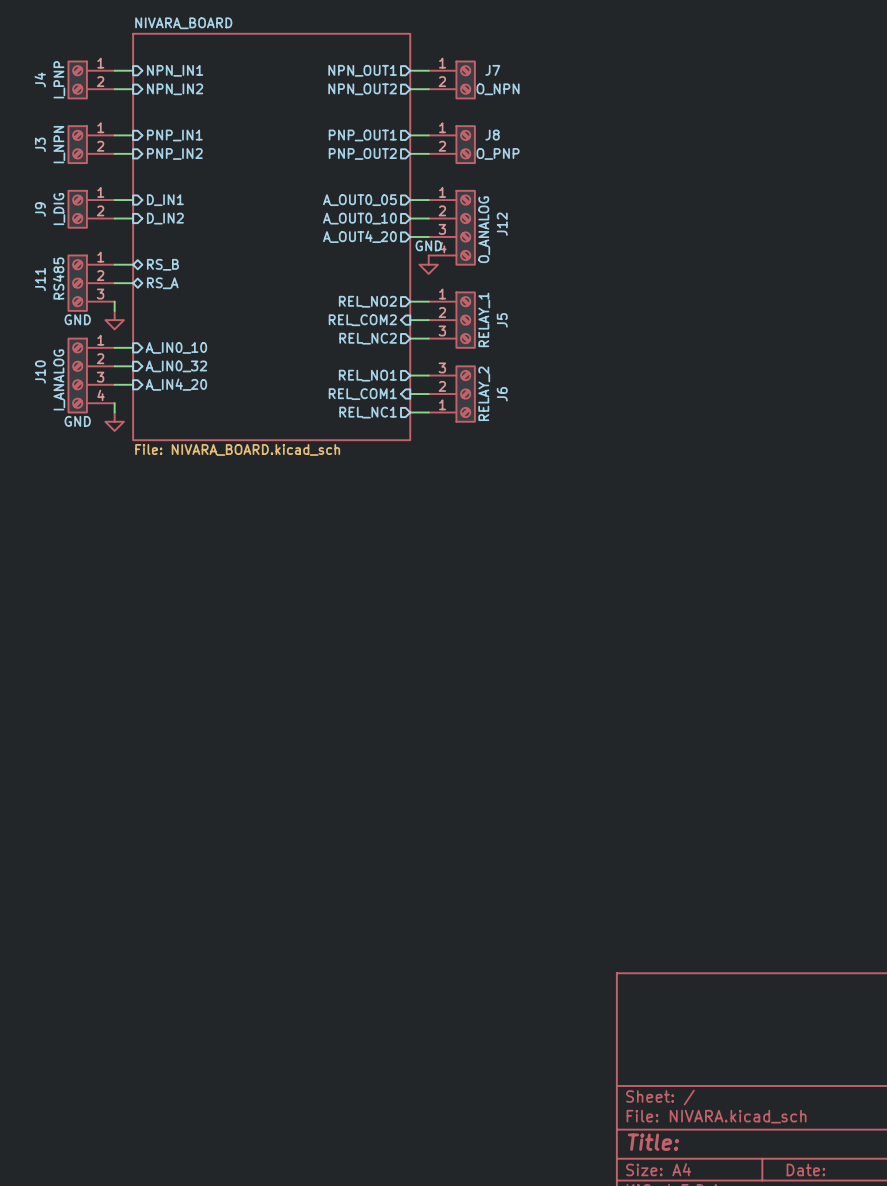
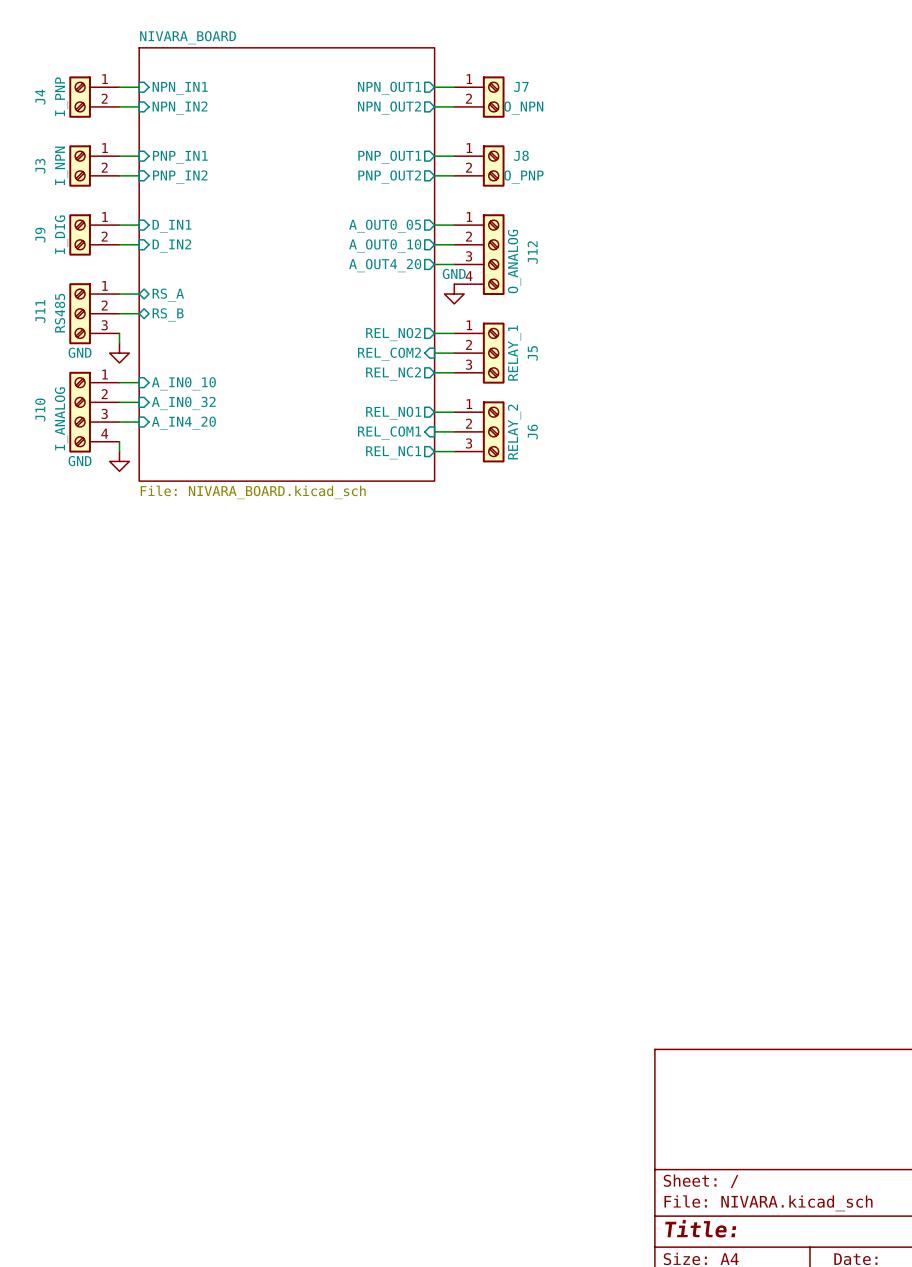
sheet pin: RS_B (162, 264) -> RS_A (168, 295)
sheet pin: RS_A (162, 283) -> RS_B (168, 314)
J6 flip: as is (465, 394) -> up-down (493, 431)

